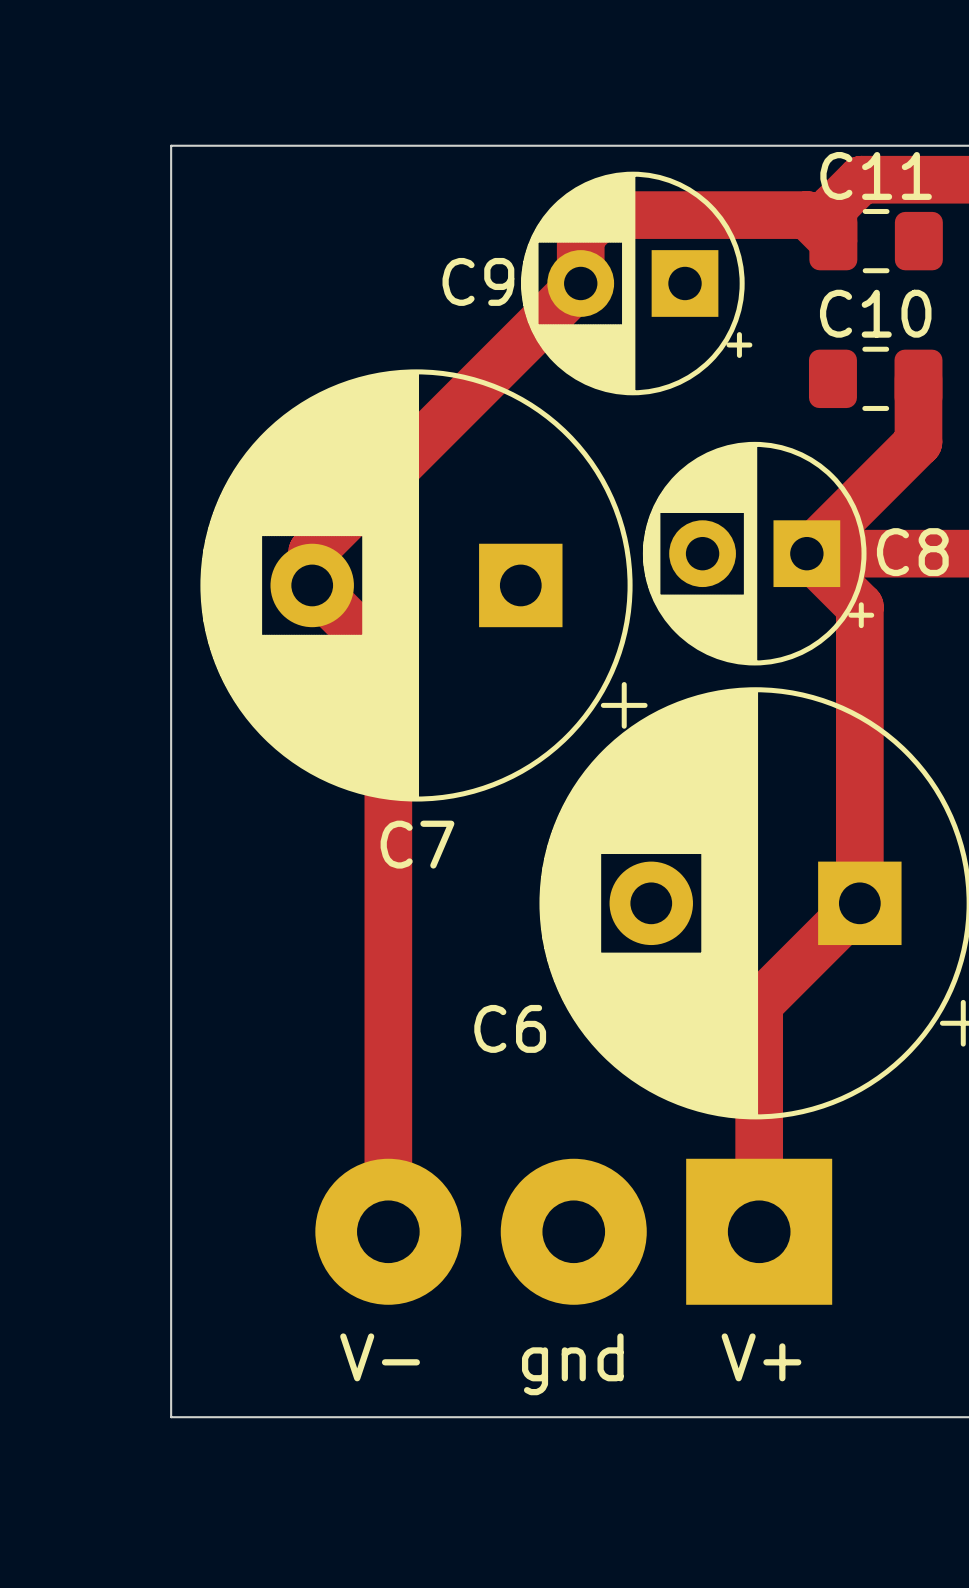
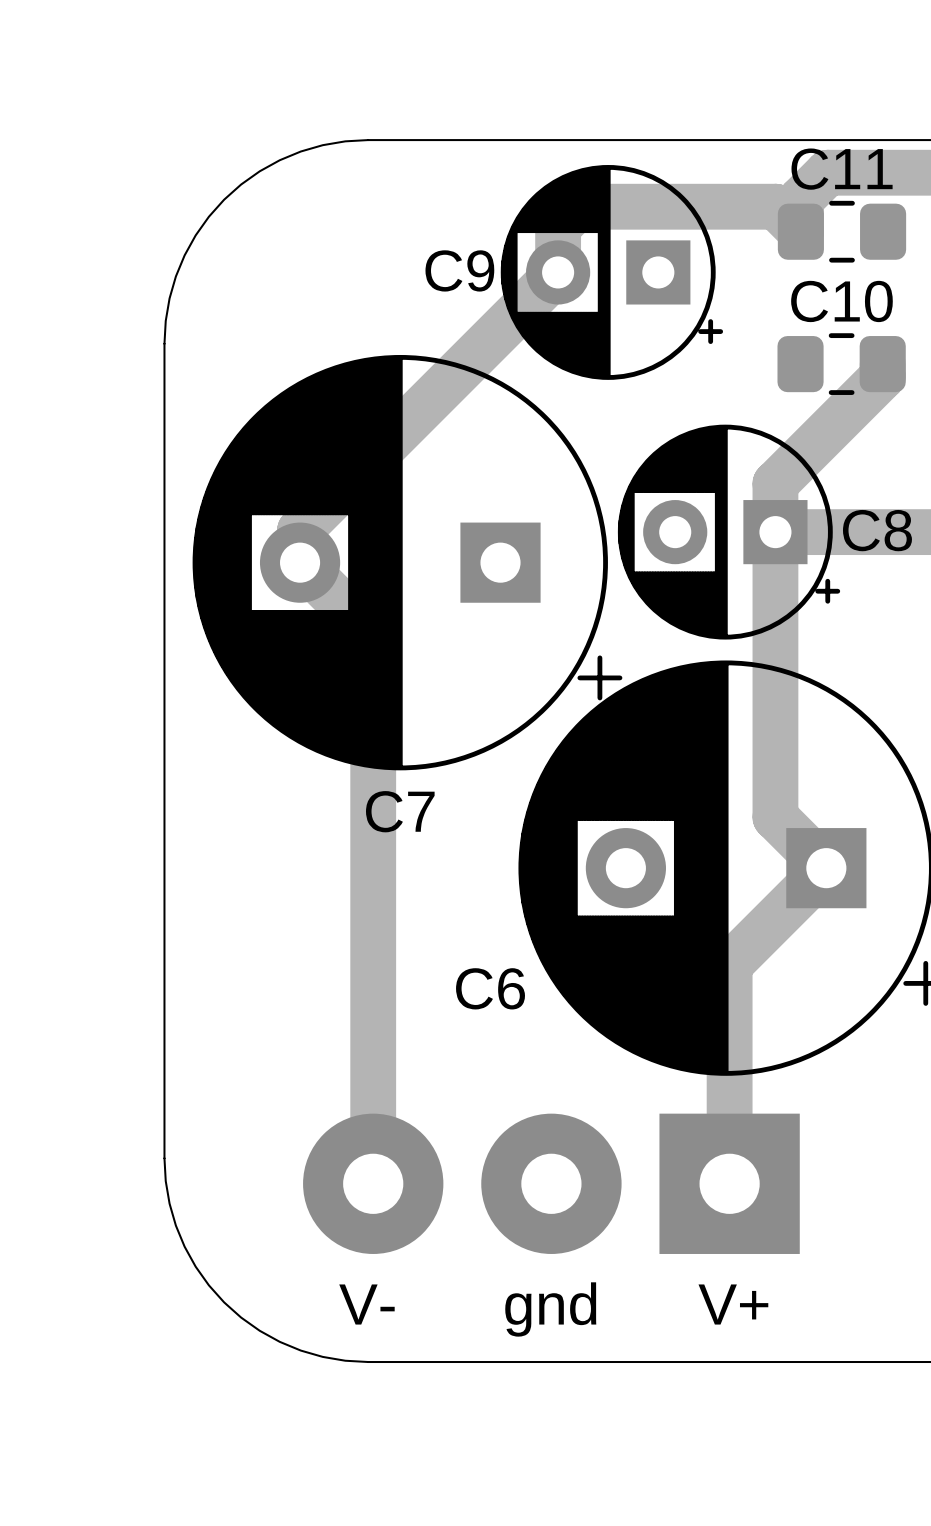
board edge: (383, 145) (171, 145) (171, 357) -> (368, 140) (322, 145) (279, 160) (259, 171) (224, 199) (195, 235) (184, 255) (169, 298) (164, 343)
track: (918, 391) (918, 442) (806, 553) (859, 606) (859, 903) -> (882, 376) (775, 483) (775, 817) (826, 868)
board edge: (171, 1205) (171, 1417) (383, 1417) -> (164, 1158) (169, 1203) (184, 1246) (195, 1266) (224, 1302) (259, 1330) (279, 1341) (322, 1356) (368, 1362)

